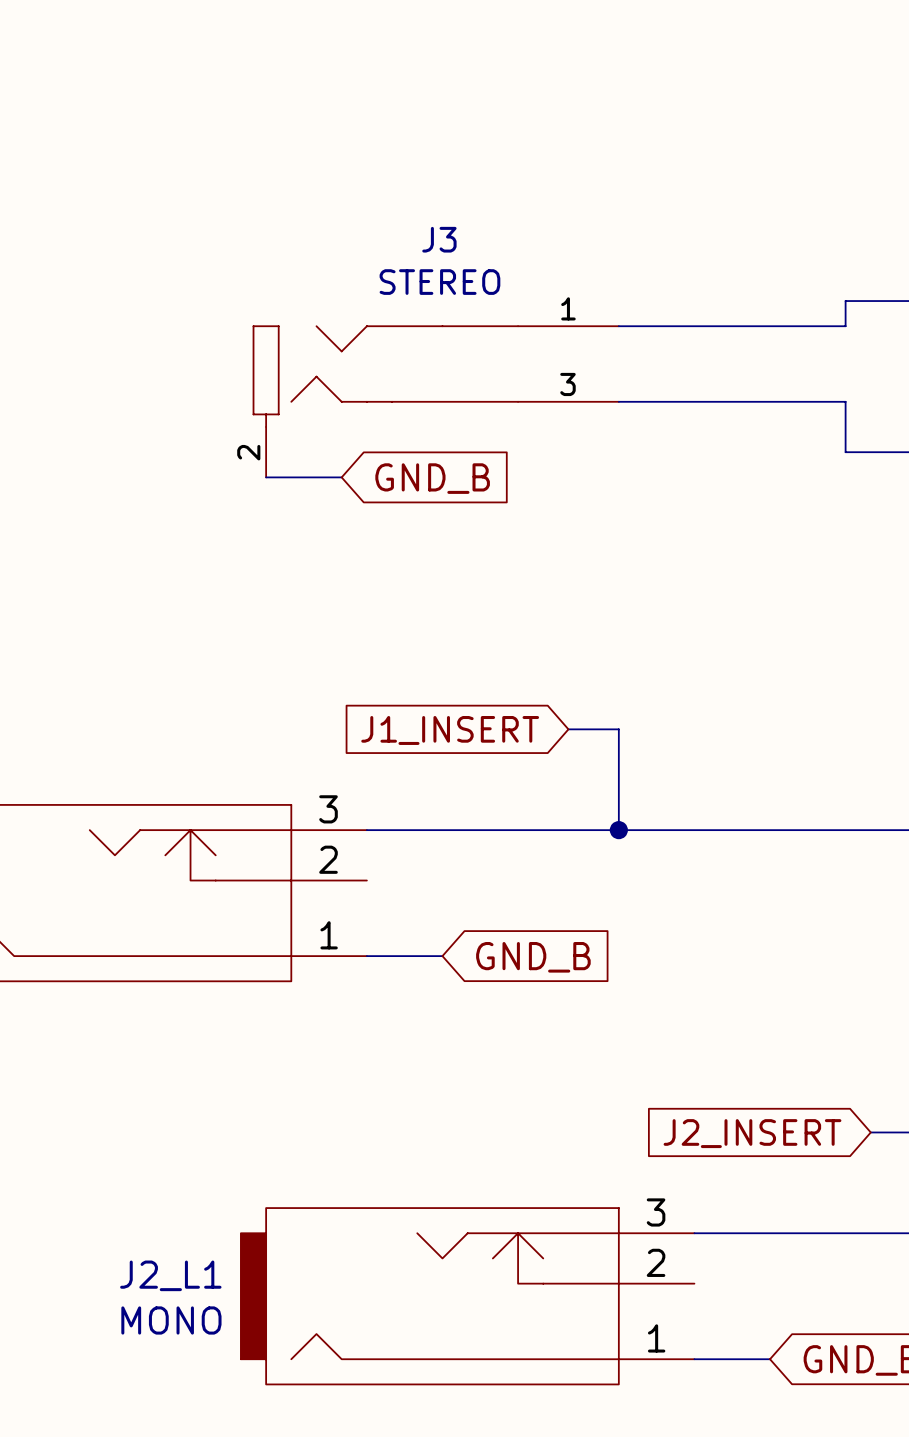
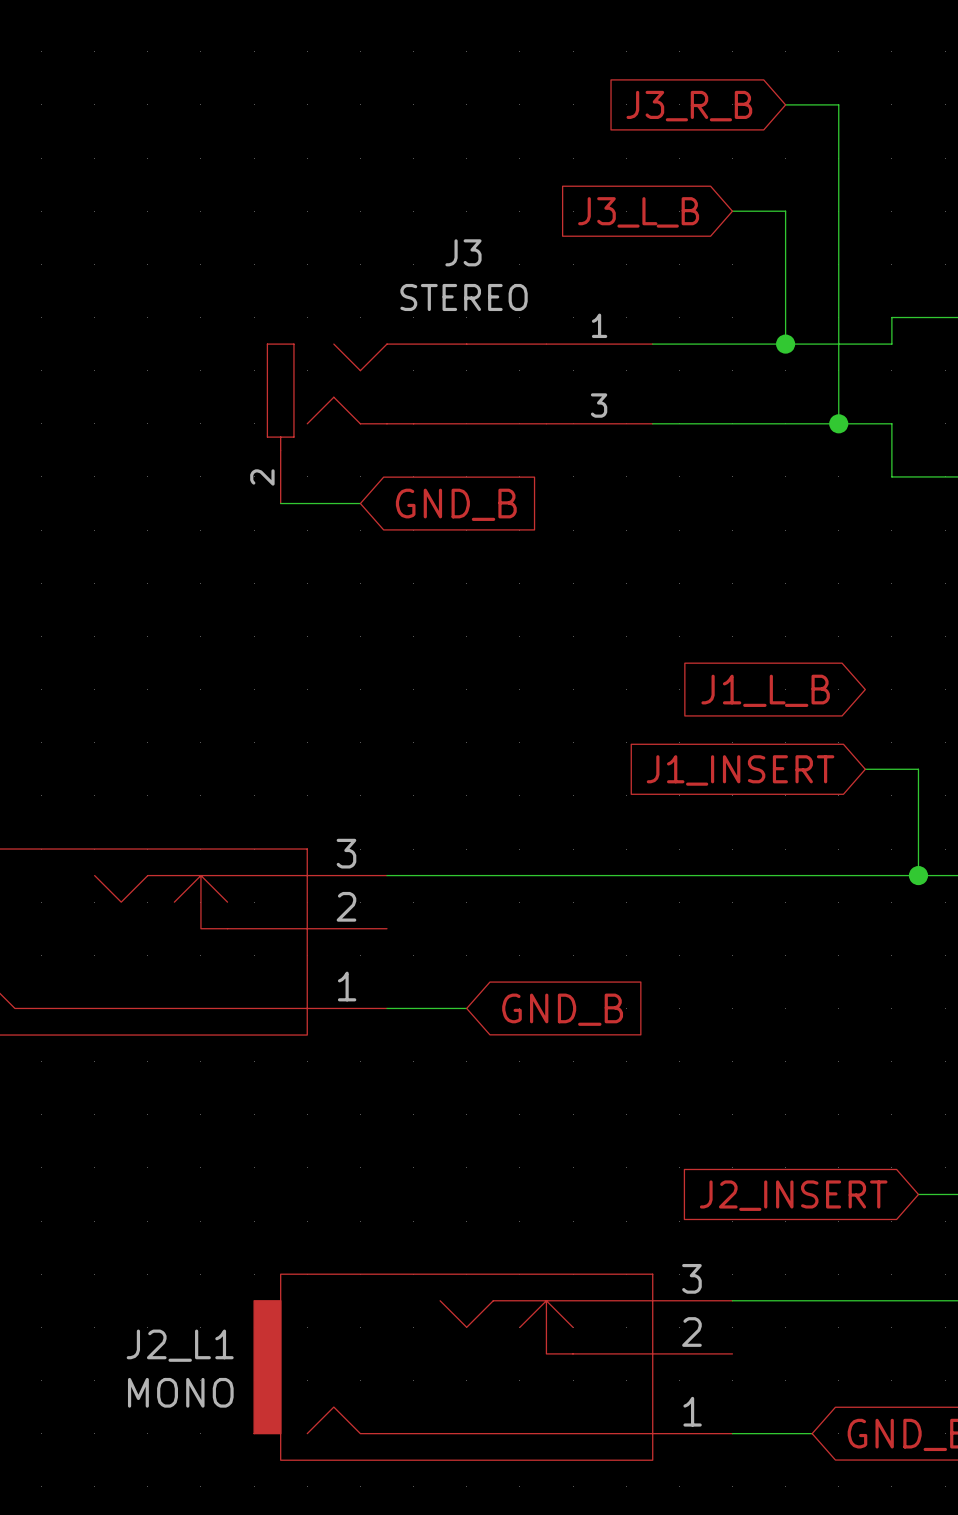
wire: none -> (785, 104) (838, 104) (838, 423)
global label: none -> J3_R_B (689, 106)
wire: none -> (732, 211) (785, 211) (785, 344)
global label: none -> J3_L_B (638, 212)
junction: none -> (785, 344)
junction: none -> (838, 423)
global label: none -> J1_L_B (765, 690)
wire: (568, 729) (618, 729) (618, 830) -> (865, 769) (918, 769) (918, 875)
global label position: J1_INSERT (450, 730) -> J1_INSERT (740, 770)
junction: (618, 830) -> none
junction: none -> (918, 875)

